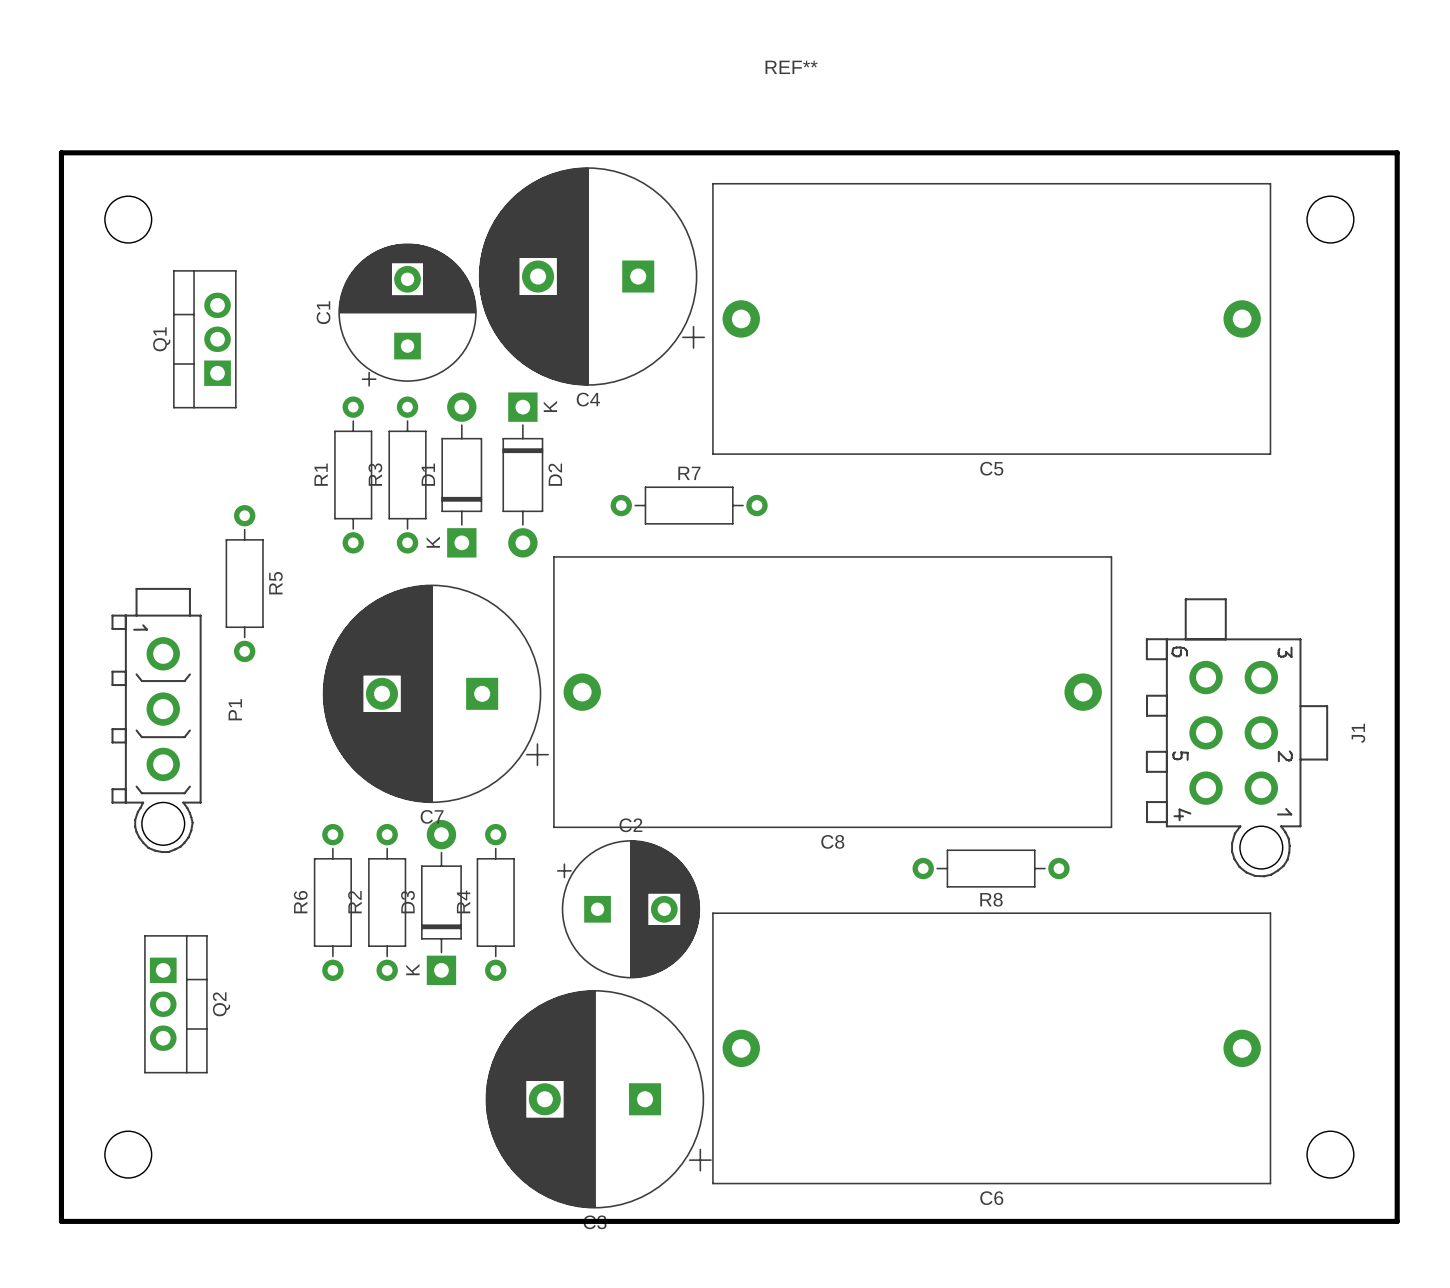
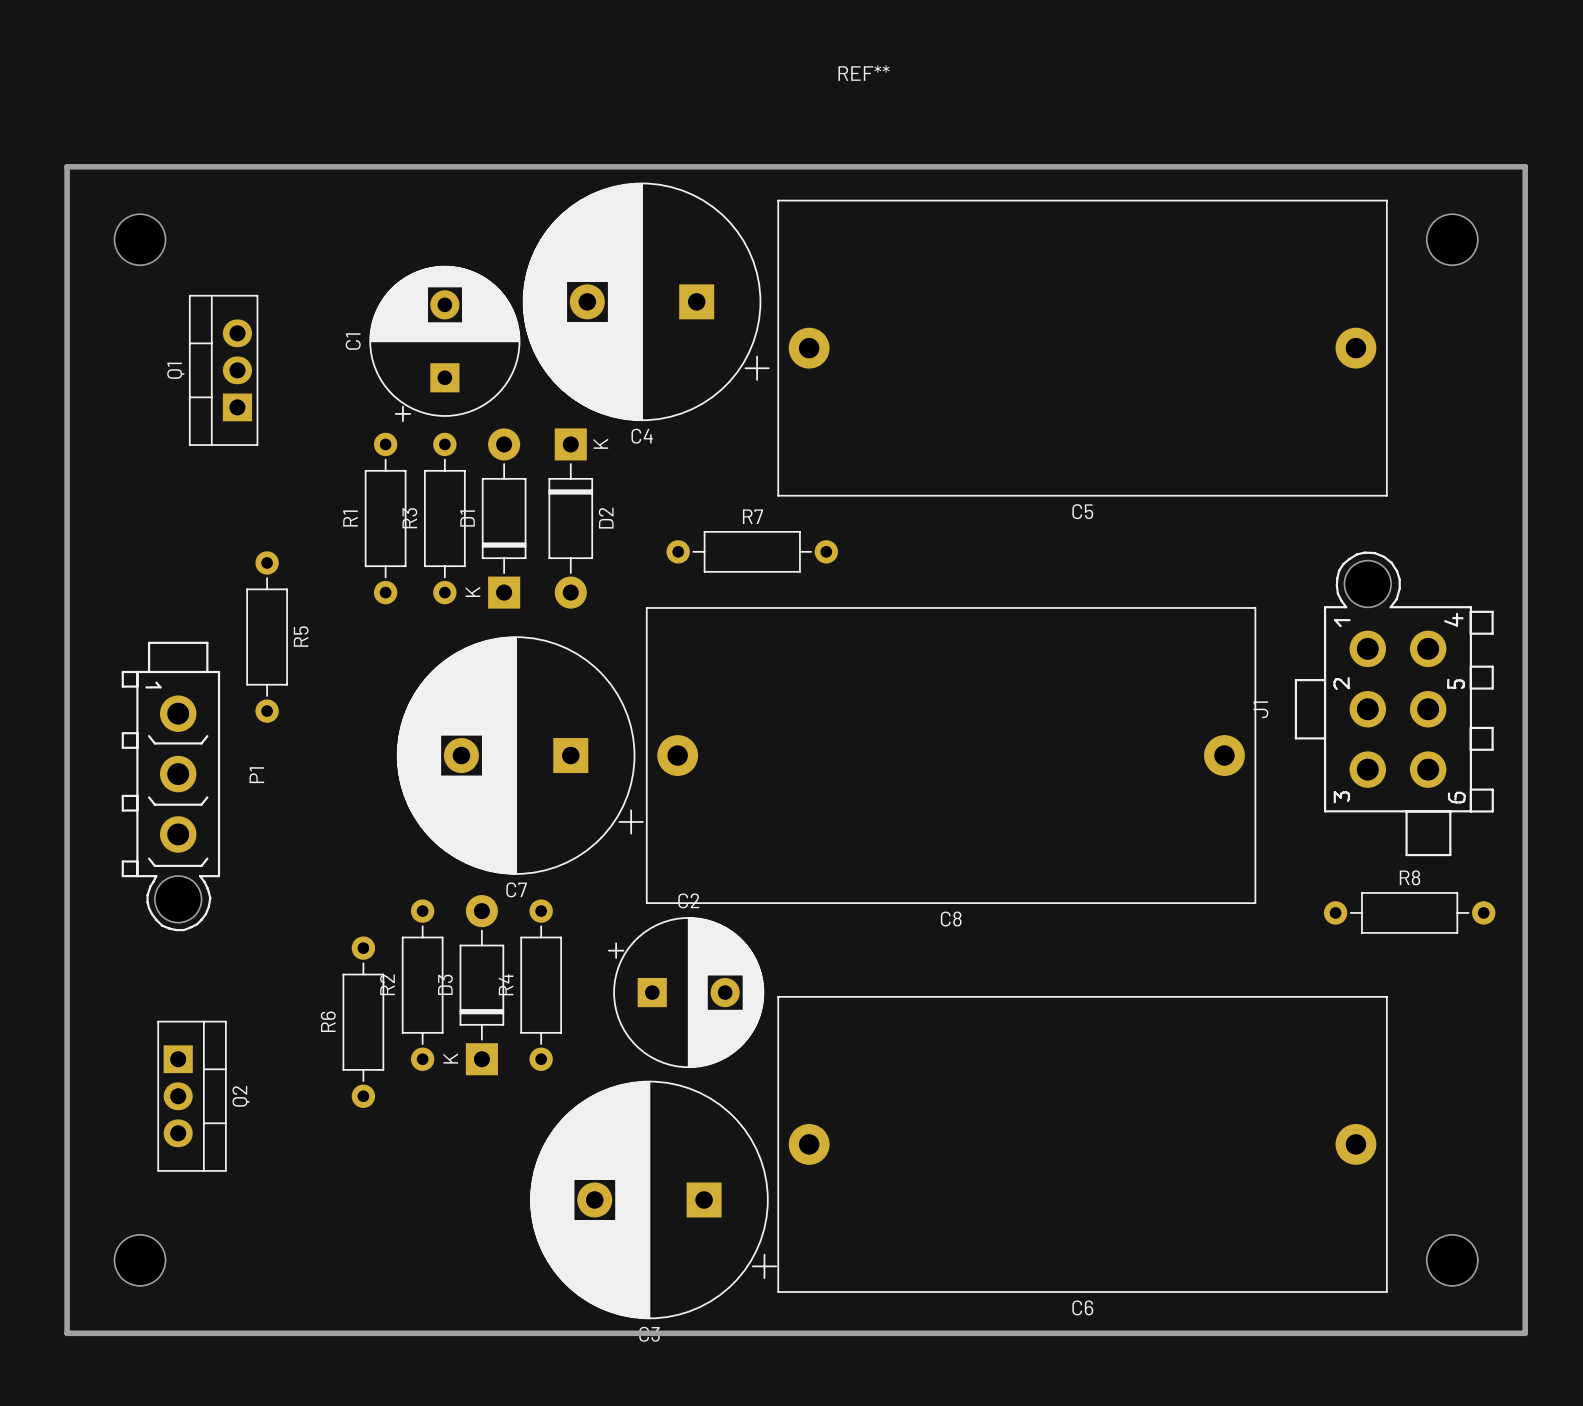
C8 position: (832, 692) -> (951, 755)
C7 position: (435, 693) -> (520, 755)
J1 rotation: 0° (1237, 737) -> 180° (1394, 703)
R8 position: (991, 868) -> (1409, 912)
R8 name position: R8 (991, 899) -> R8 (1409, 877)
R6 position: (332, 902) -> (363, 1022)

